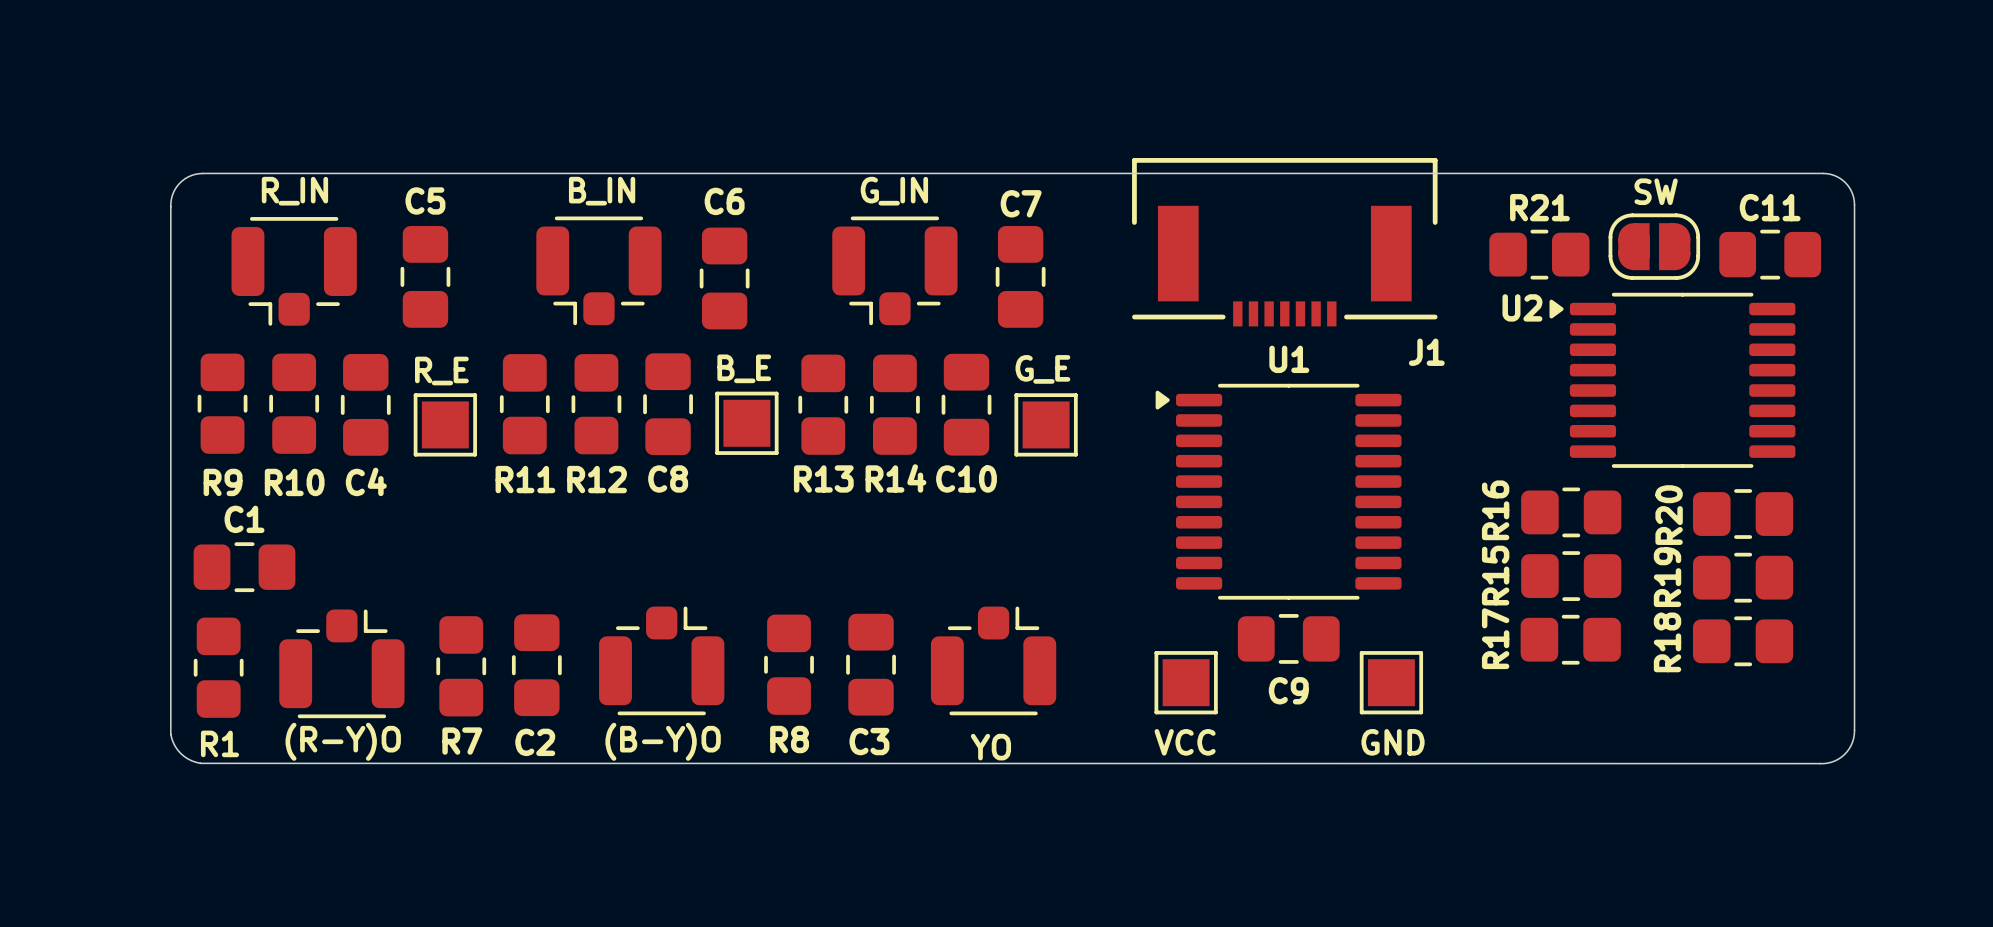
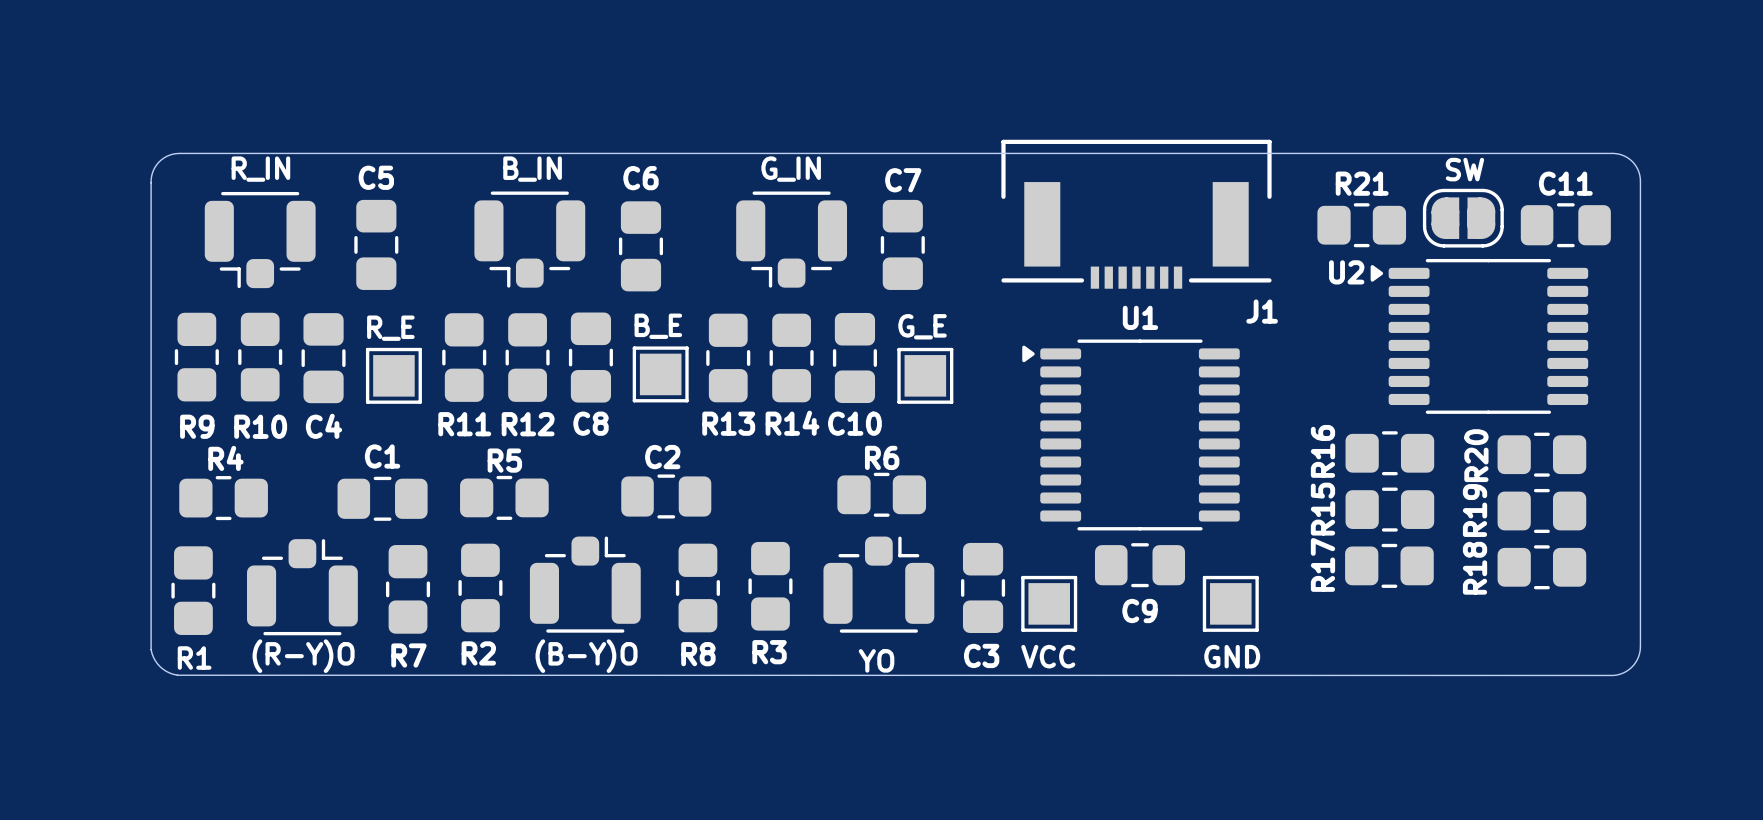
R6: none -> (881, 494)
R5: none -> (504, 497)
R4: none -> (223, 498)
C1 position: (244, 567) -> (382, 498)
R3: none -> (770, 586)
R2: none -> (480, 587)
C3 position: (871, 664) -> (983, 587)
C2 rotation: 0° (536, 665) -> 90° clockwise (666, 496)
C2 position: (536, 665) -> (666, 496)
C2 name position: C2 (535, 742) -> C2 (662, 457)

